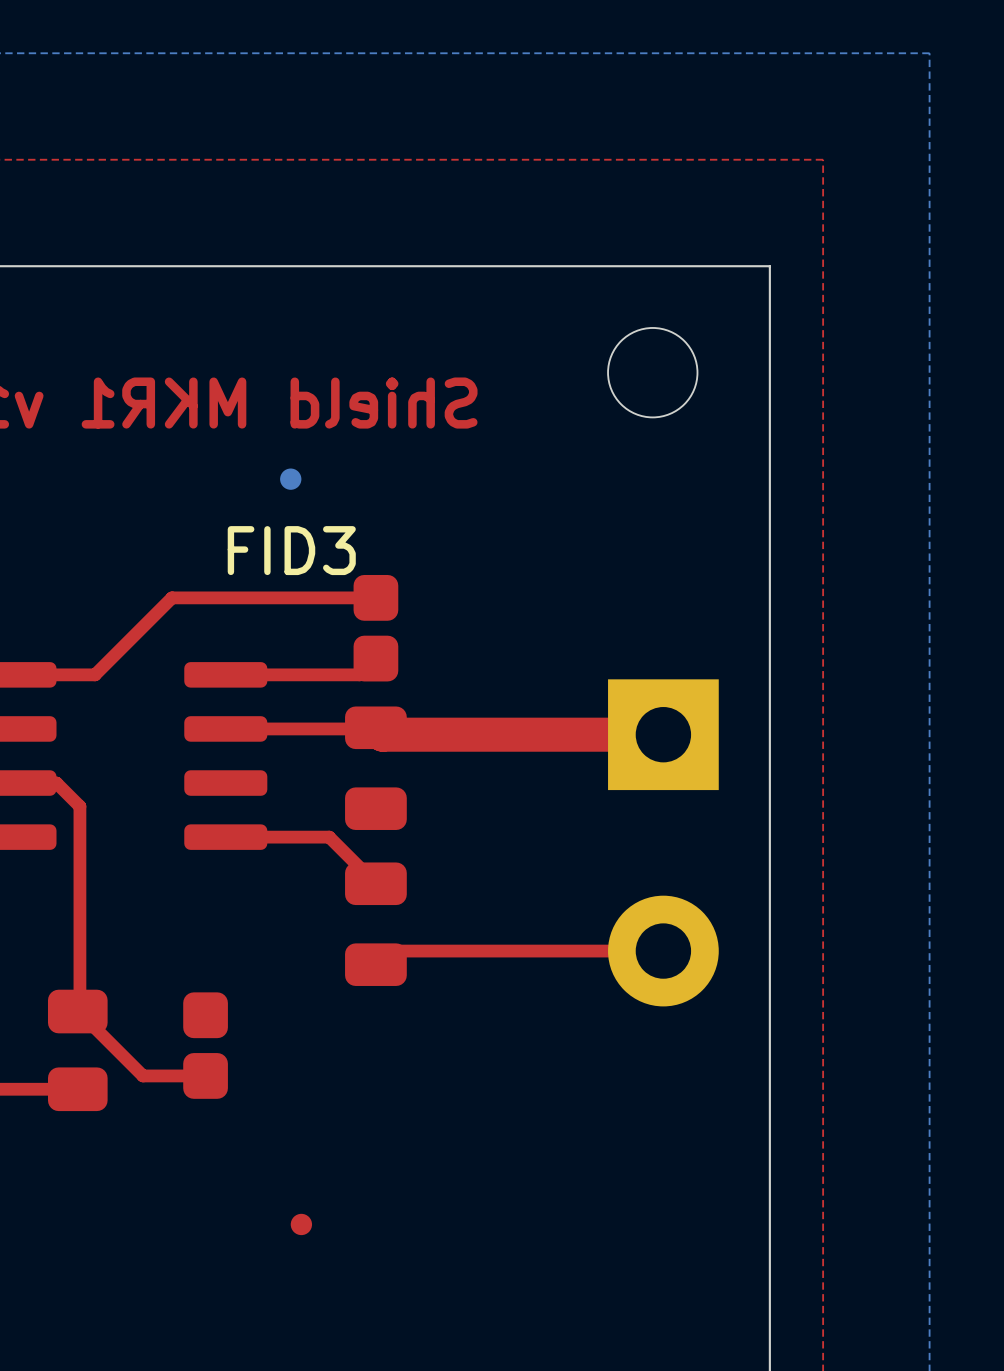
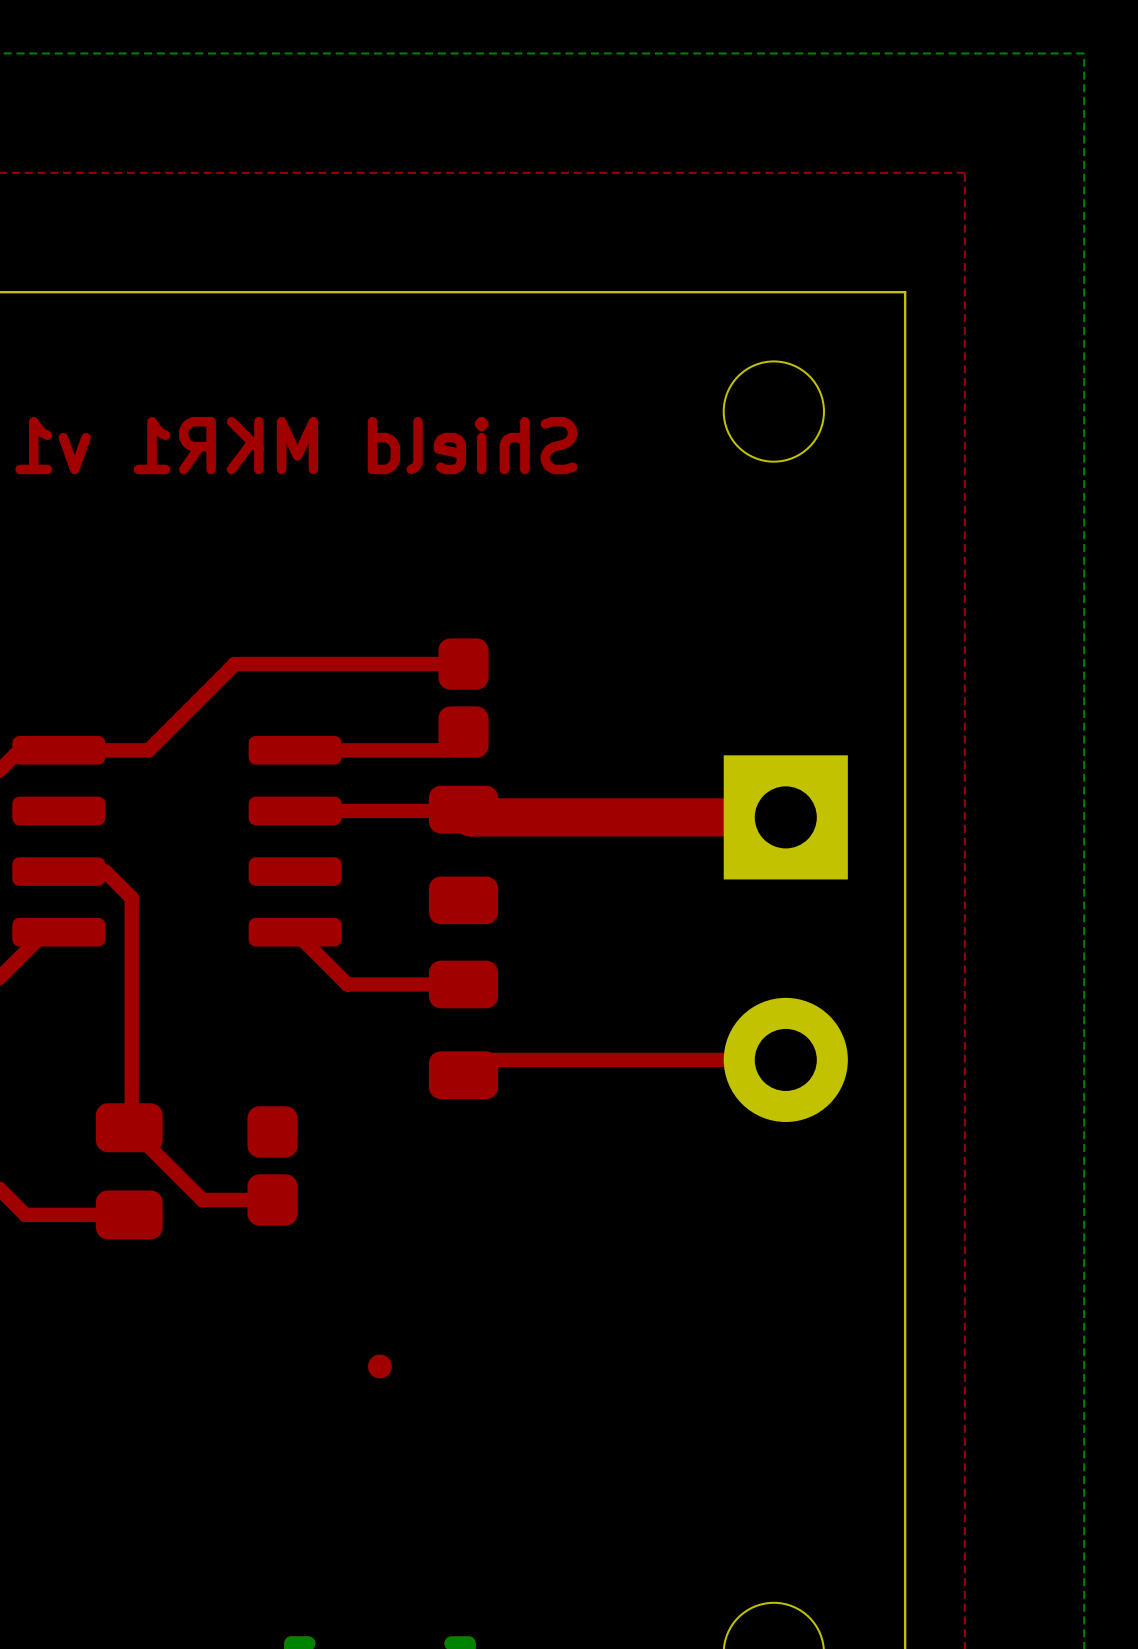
FID3: (290, 479) -> none
top track: (225, 837) (329, 837) (375, 883) -> (295, 932) (347, 984) (463, 984)

